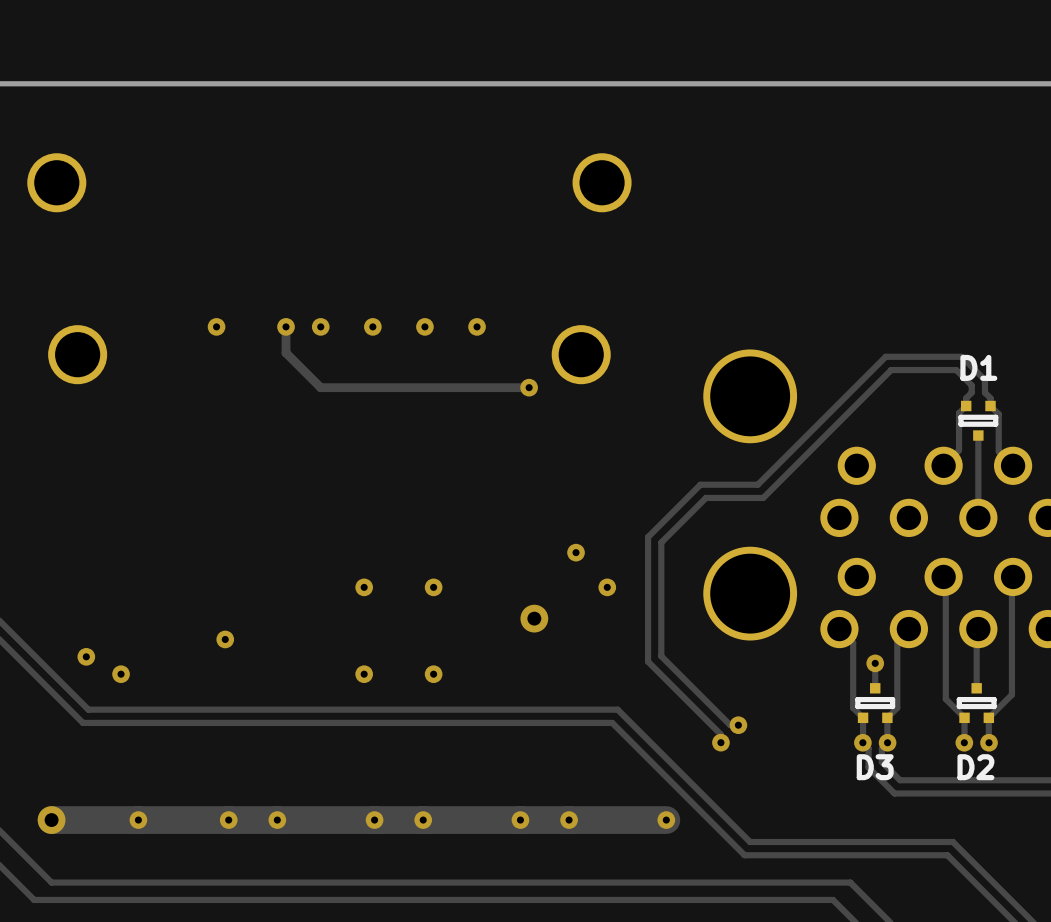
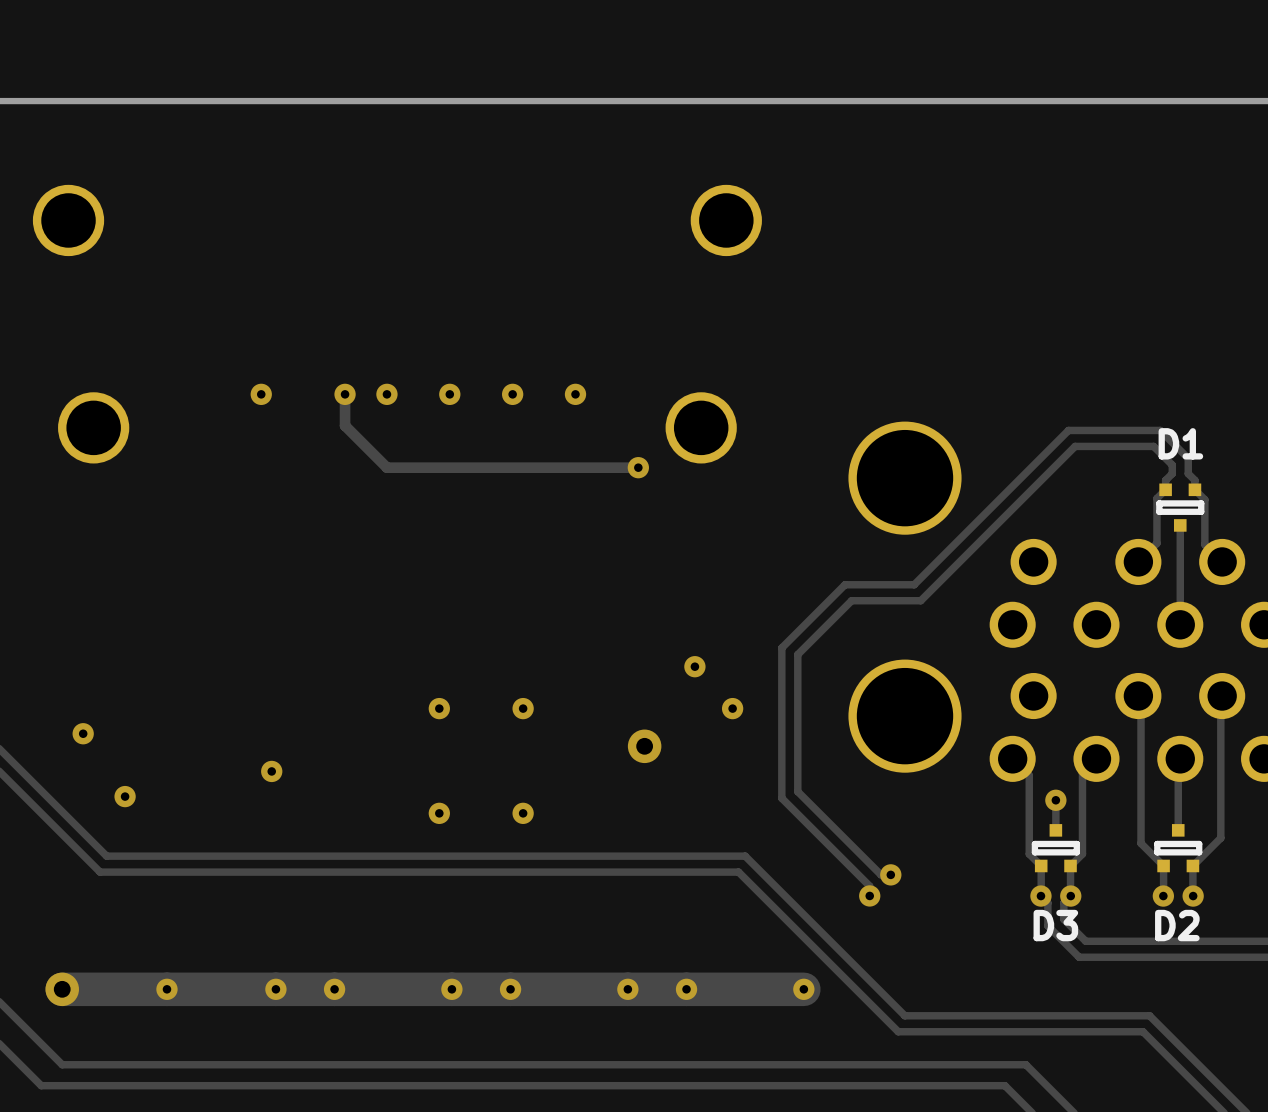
via: none -> (83, 733)
via: (86, 656) -> none
via: none -> (125, 796)
via: (121, 674) -> none

